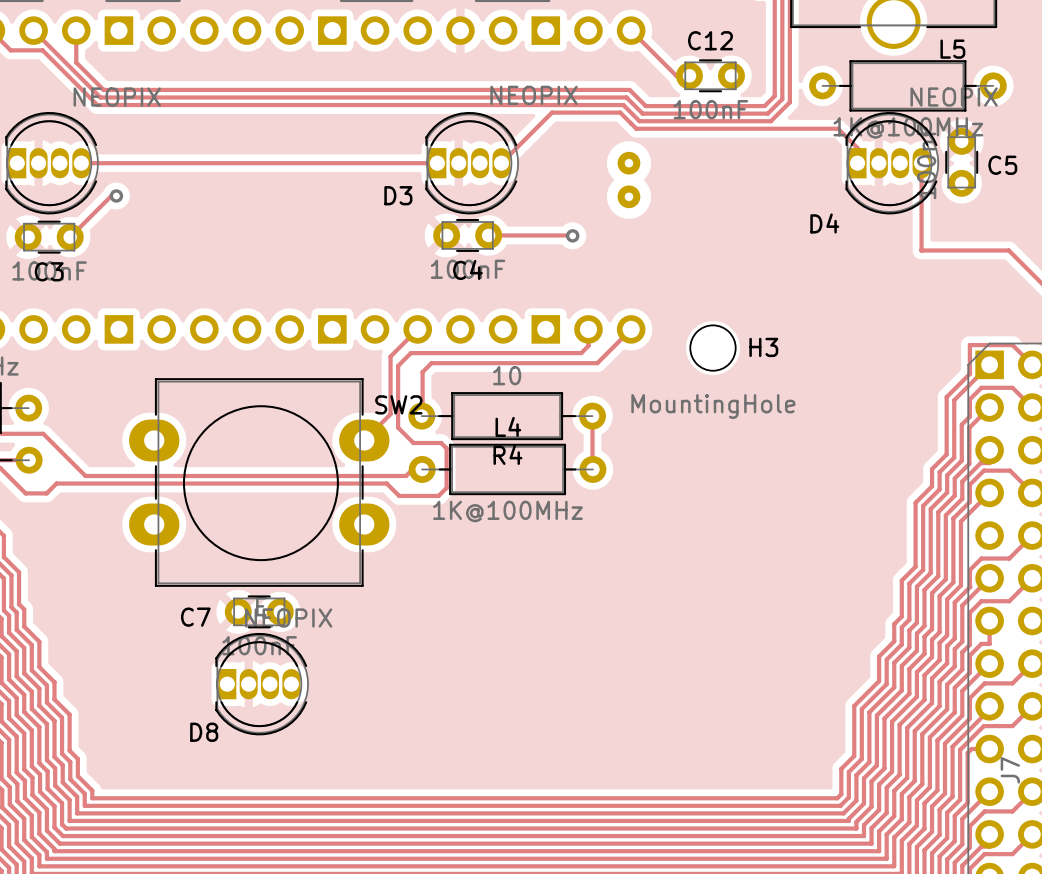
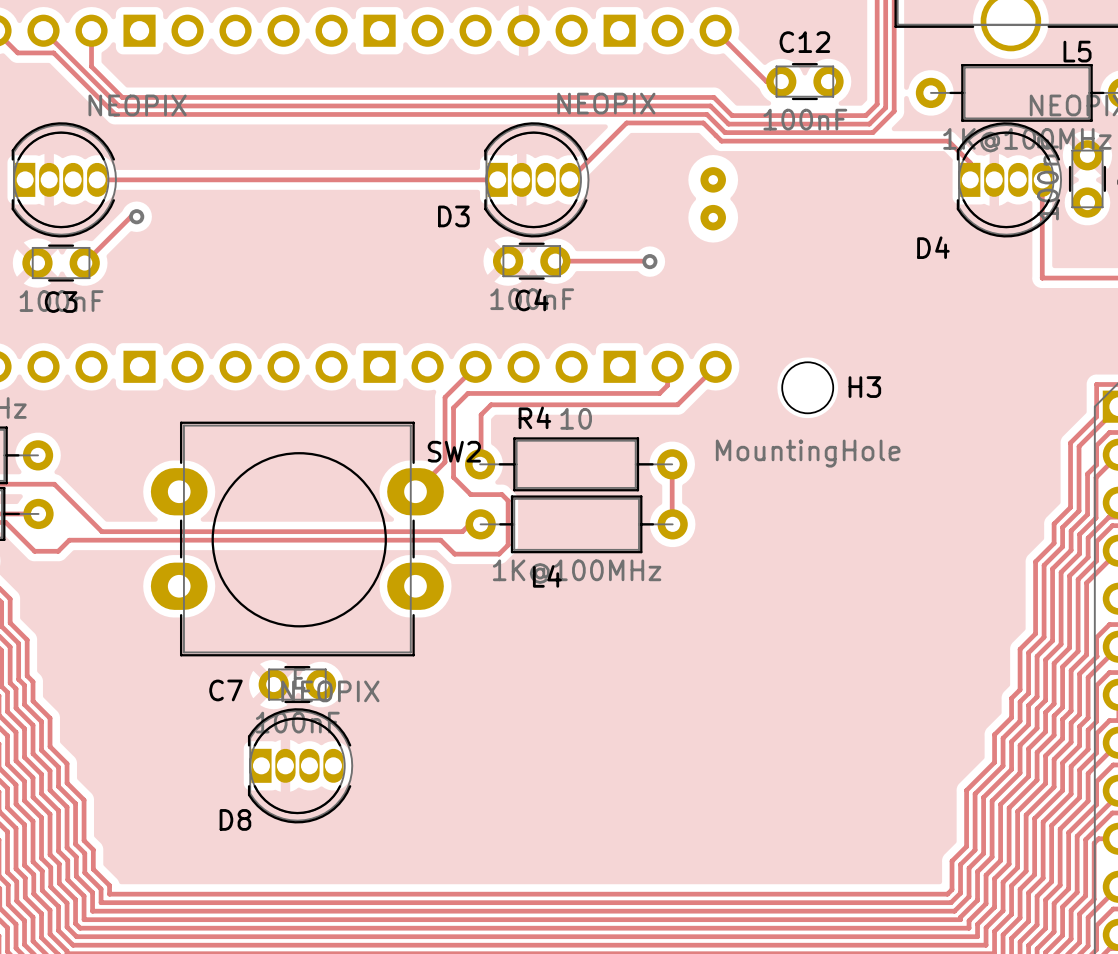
L4 name position: L4 (508, 426) -> L4 (547, 576)
R4 name position: R4 (507, 454) -> R4 (534, 417)

